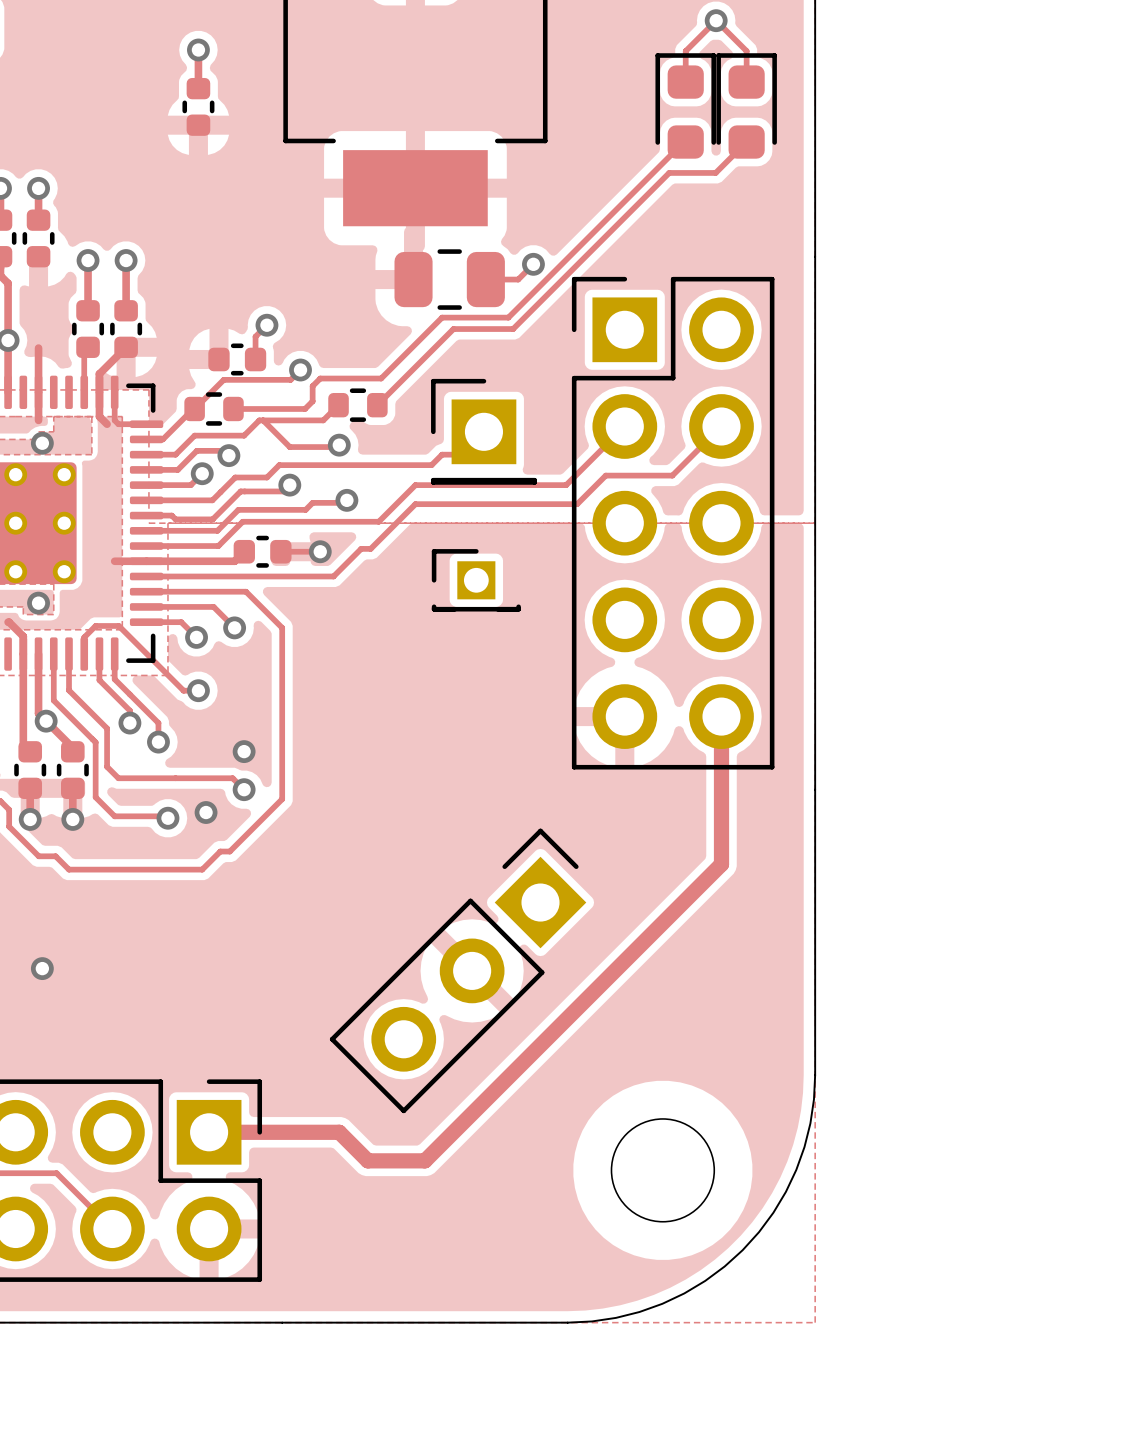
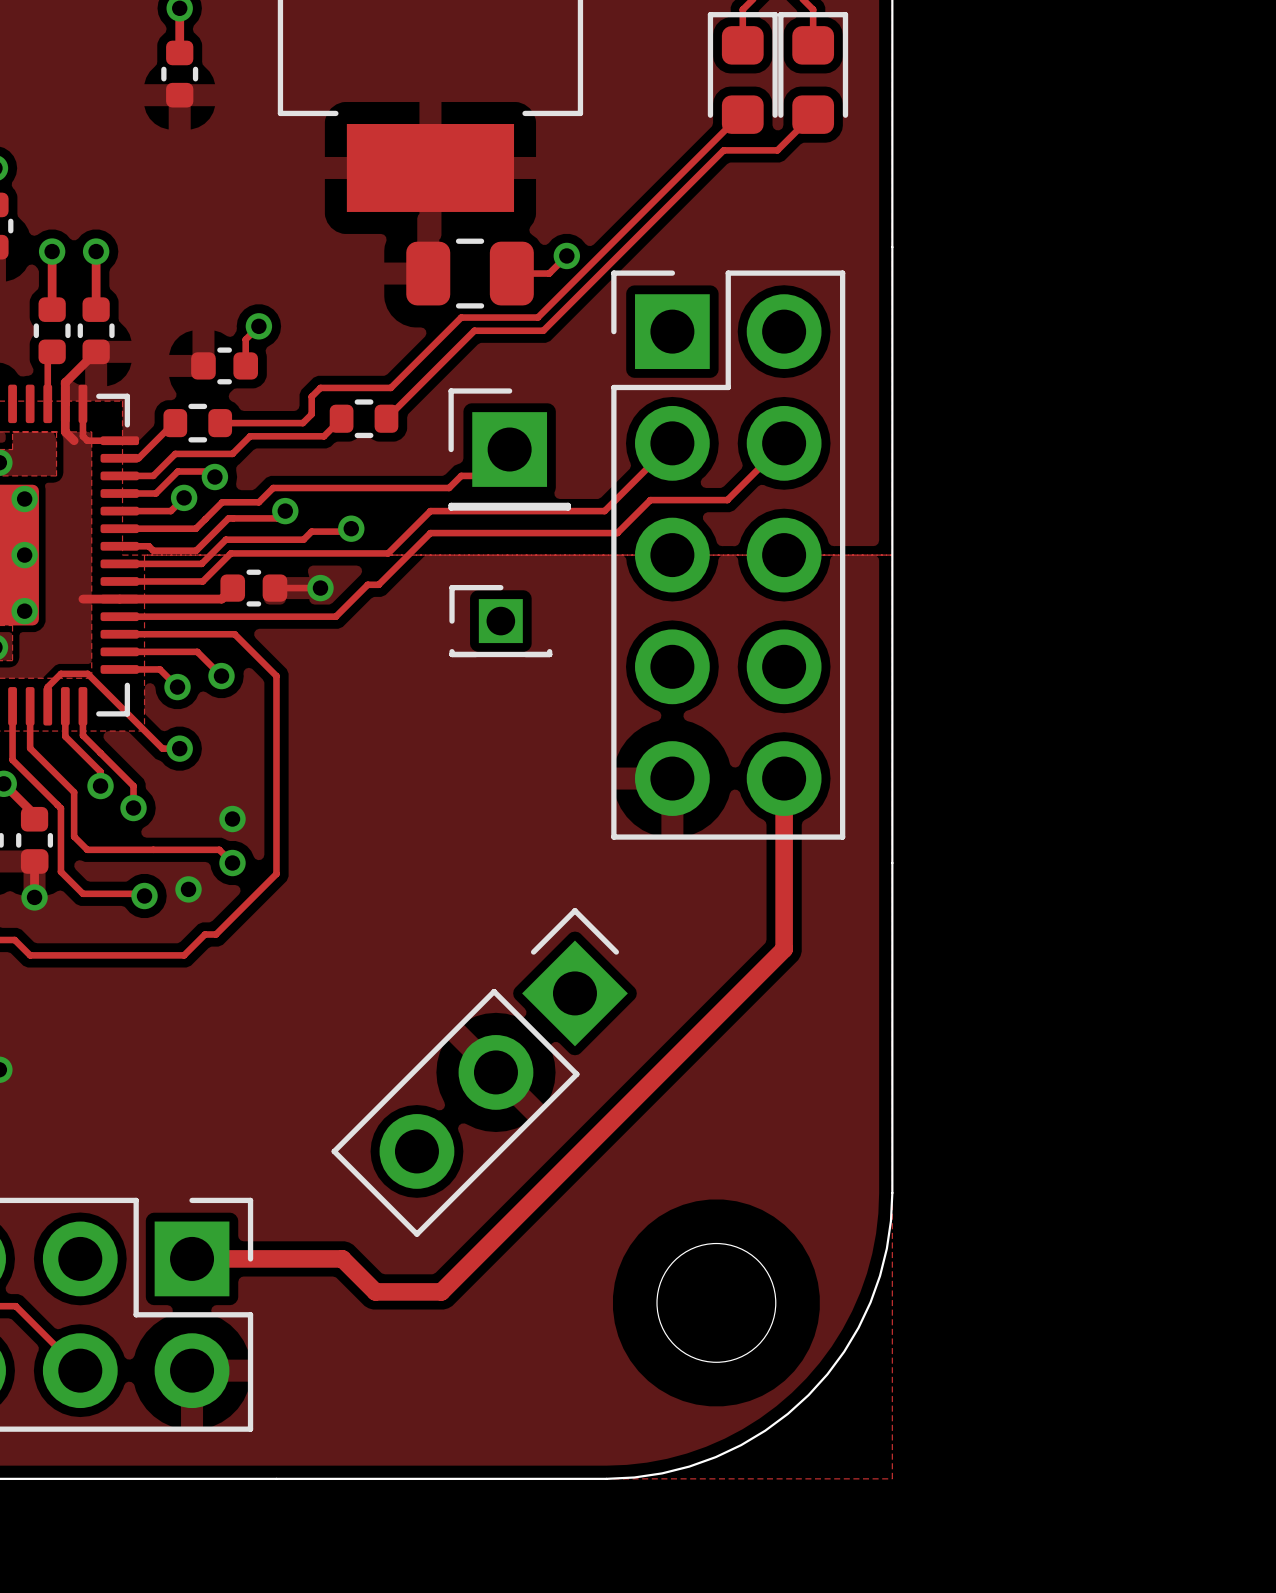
track: (300, 370) (290, 379) (223, 379) (194, 408) -> none
via: (300, 370) -> none
track: (263, 420) (289, 447) (337, 447) (339, 445) -> none
via: (339, 445) -> none

